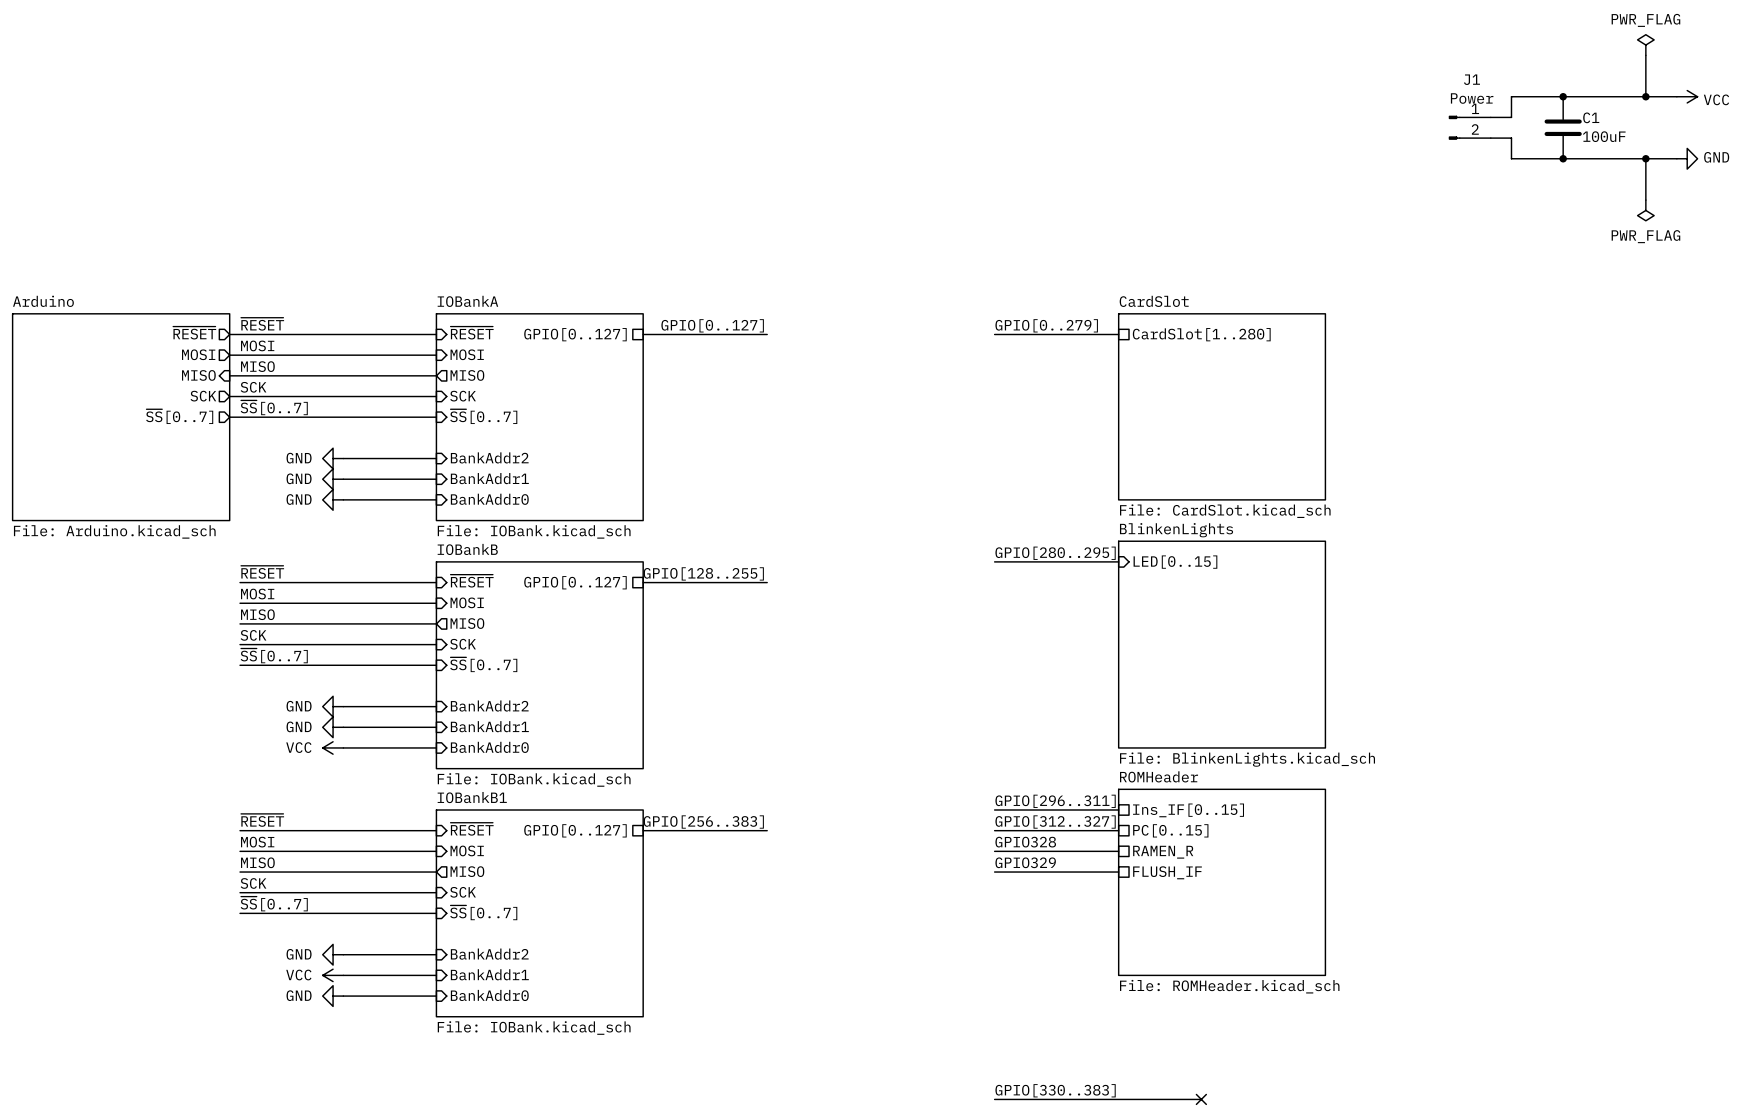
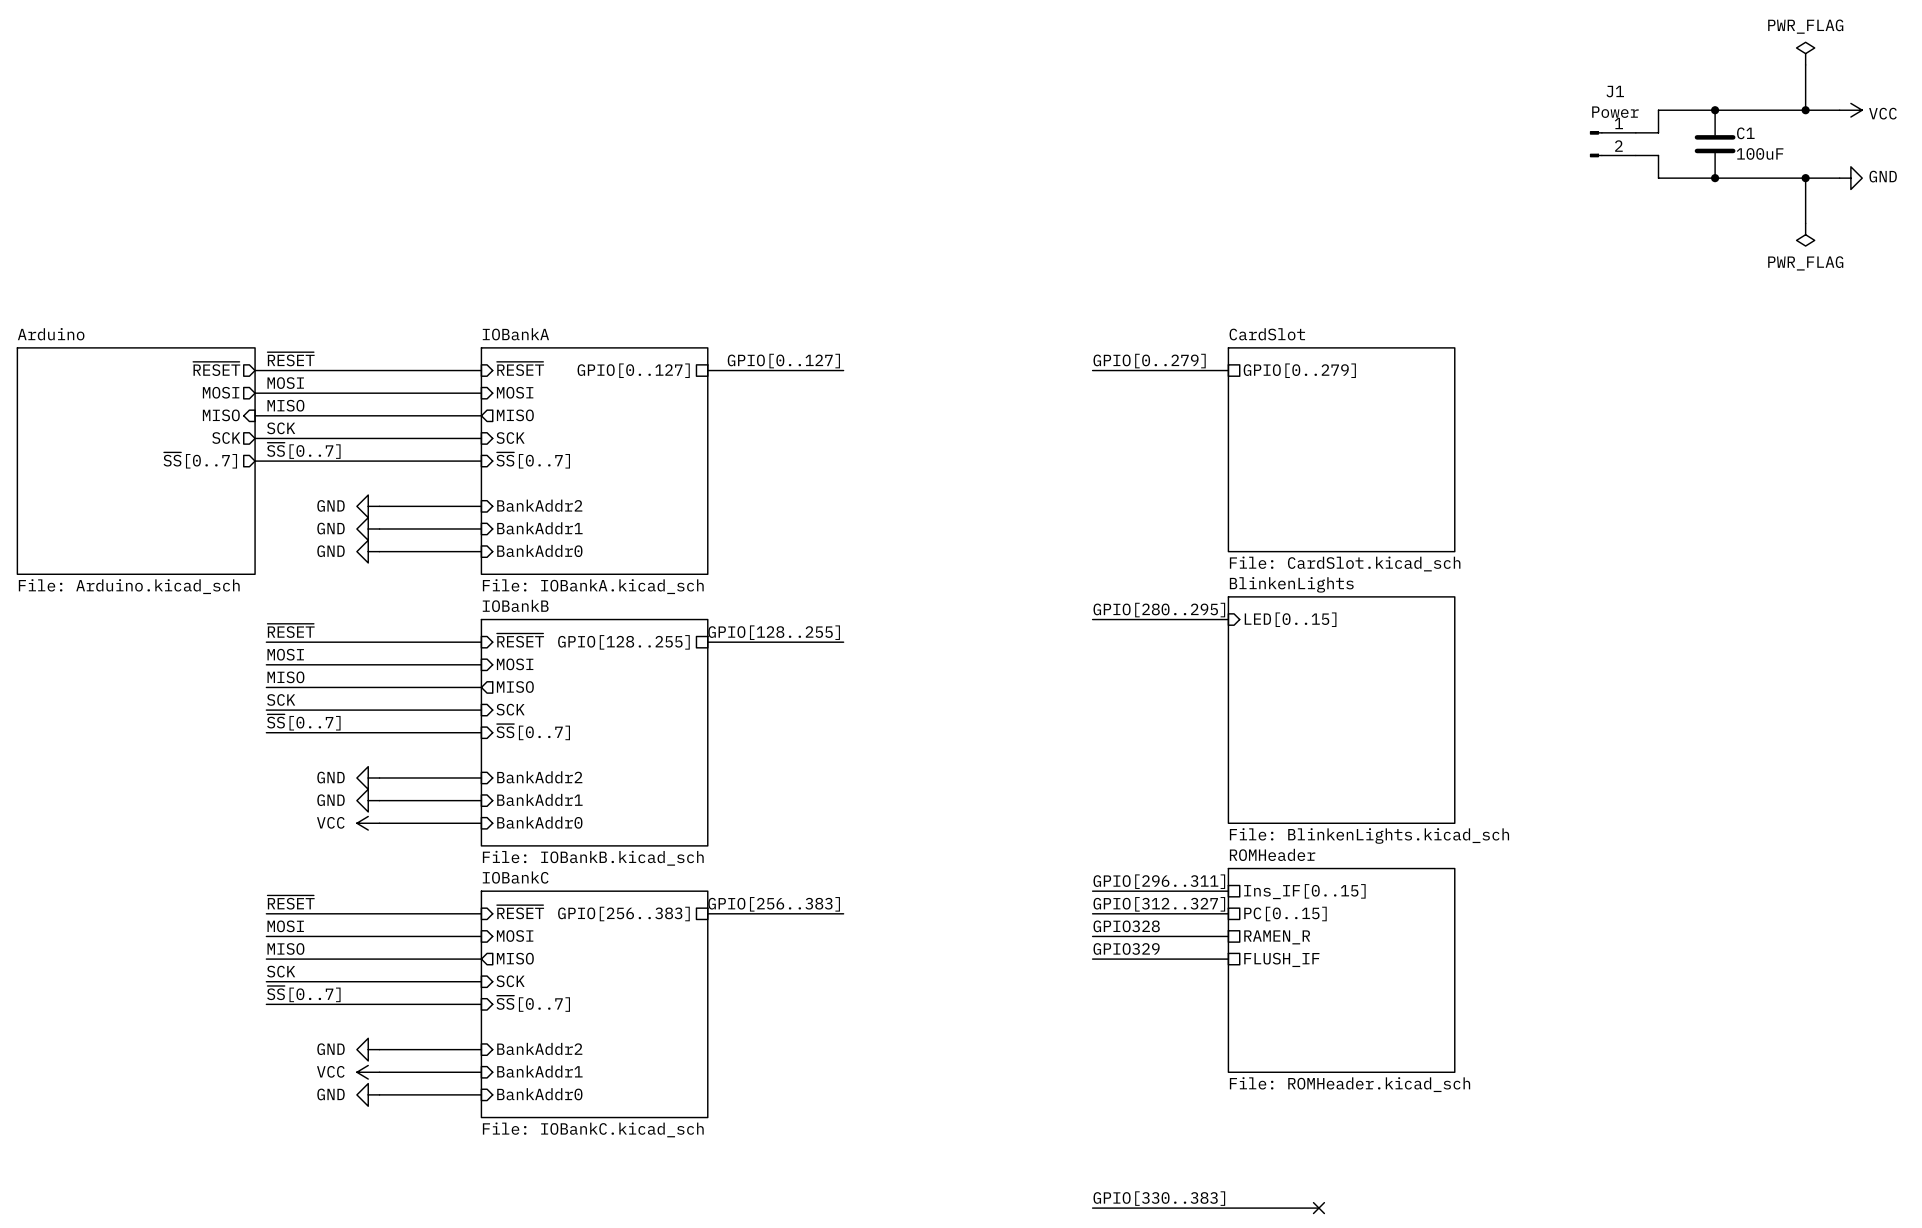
sheet pin: CardSlot[1..280] (1201, 334) -> GPIO[0..279] (1299, 370)
sheet IOBankA value: File: IOBank.kicad_sch (534, 531) -> File: IOBankA.kicad_sch (593, 586)
sheet pin: GPIO[0..127] (575, 582) -> GPIO[128..255] (623, 642)
sheet IOBankB value: File: IOBank.kicad_sch (534, 779) -> File: IOBankB.kicad_sch (593, 858)
sheet IOBankB1 name: IOBankB1 (472, 797) -> IOBankC (515, 877)
sheet pin: GPIO[0..127] (575, 830) -> GPIO[256..383] (623, 914)
sheet IOBankB1 value: File: IOBank.kicad_sch (534, 1028) -> File: IOBankC.kicad_sch (593, 1129)

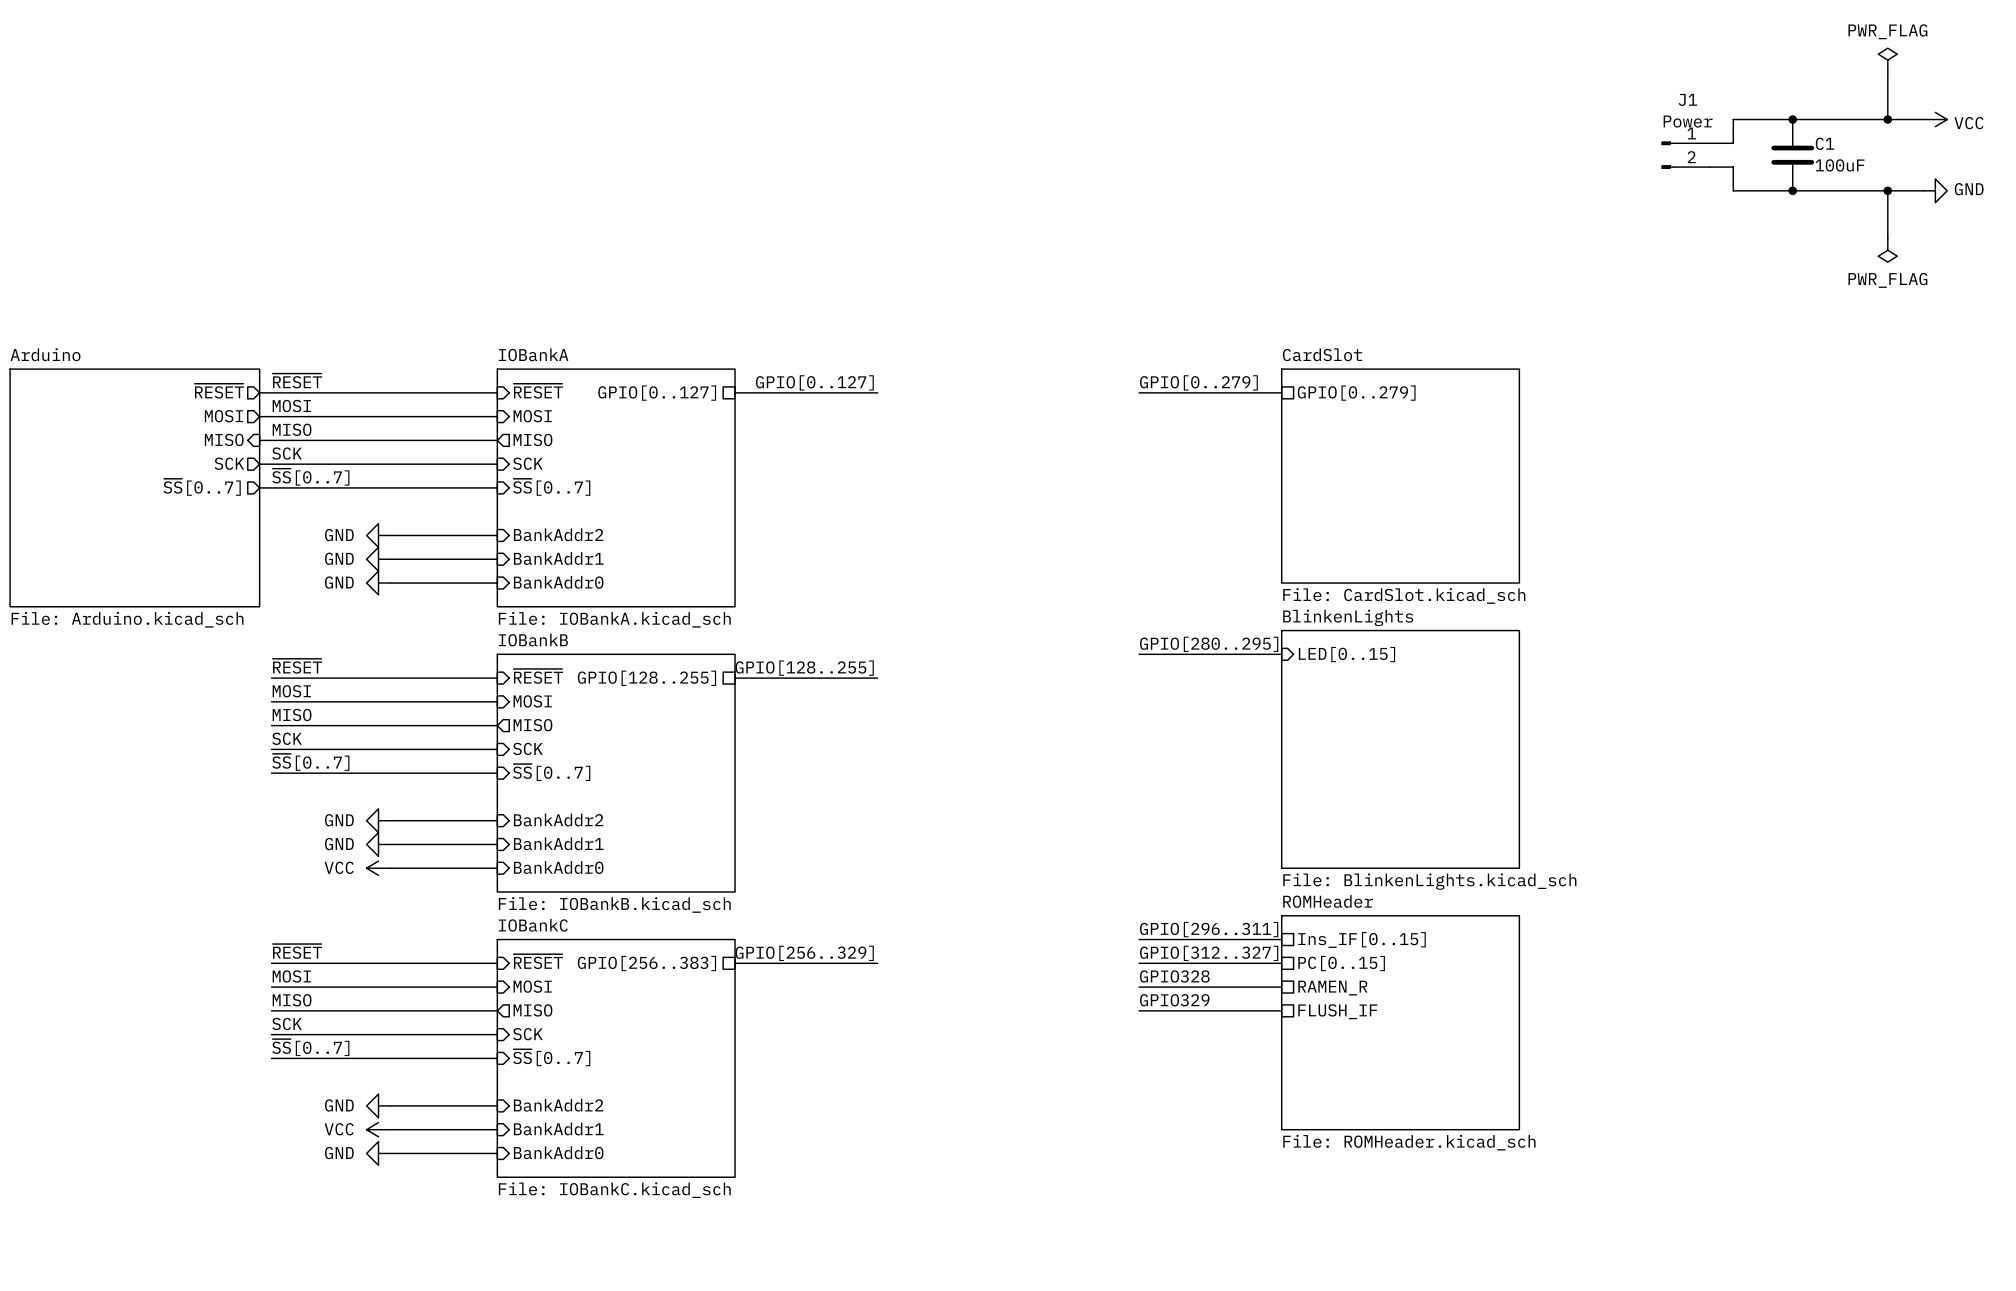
label: GPIO[256..383] (774, 904) -> GPIO[256..329] (804, 953)
label: GPIO[330..383] (1159, 1198) -> none
bus: (1092, 1208) (1318, 1208) -> none
no-connect mark: (1318, 1208) -> none

